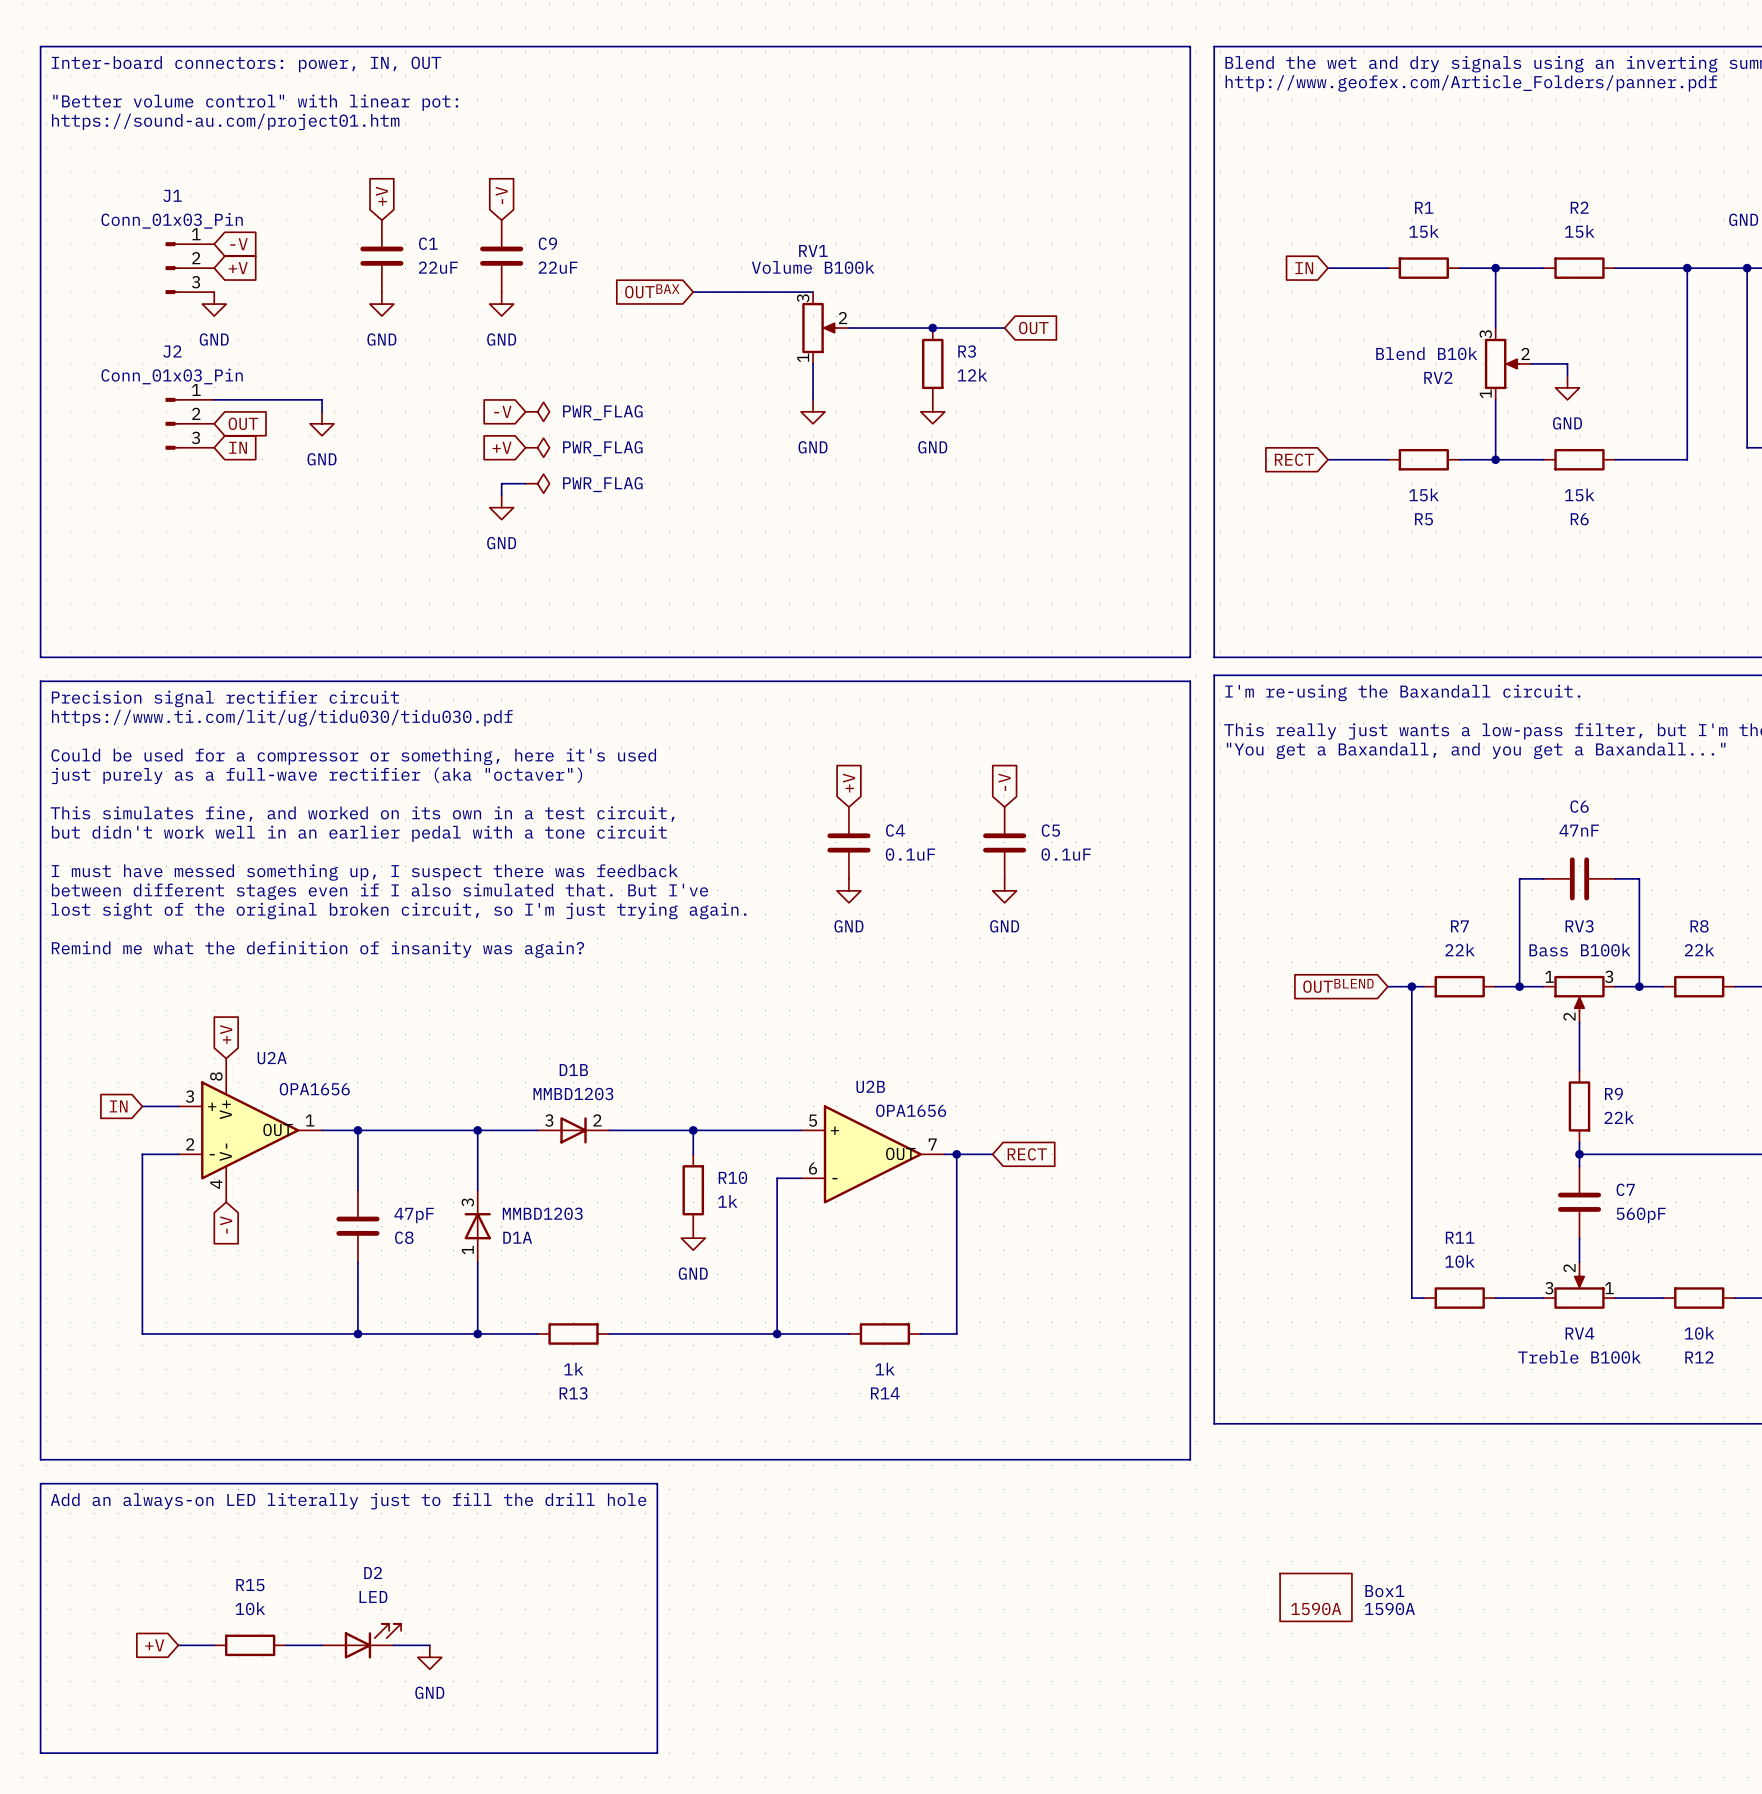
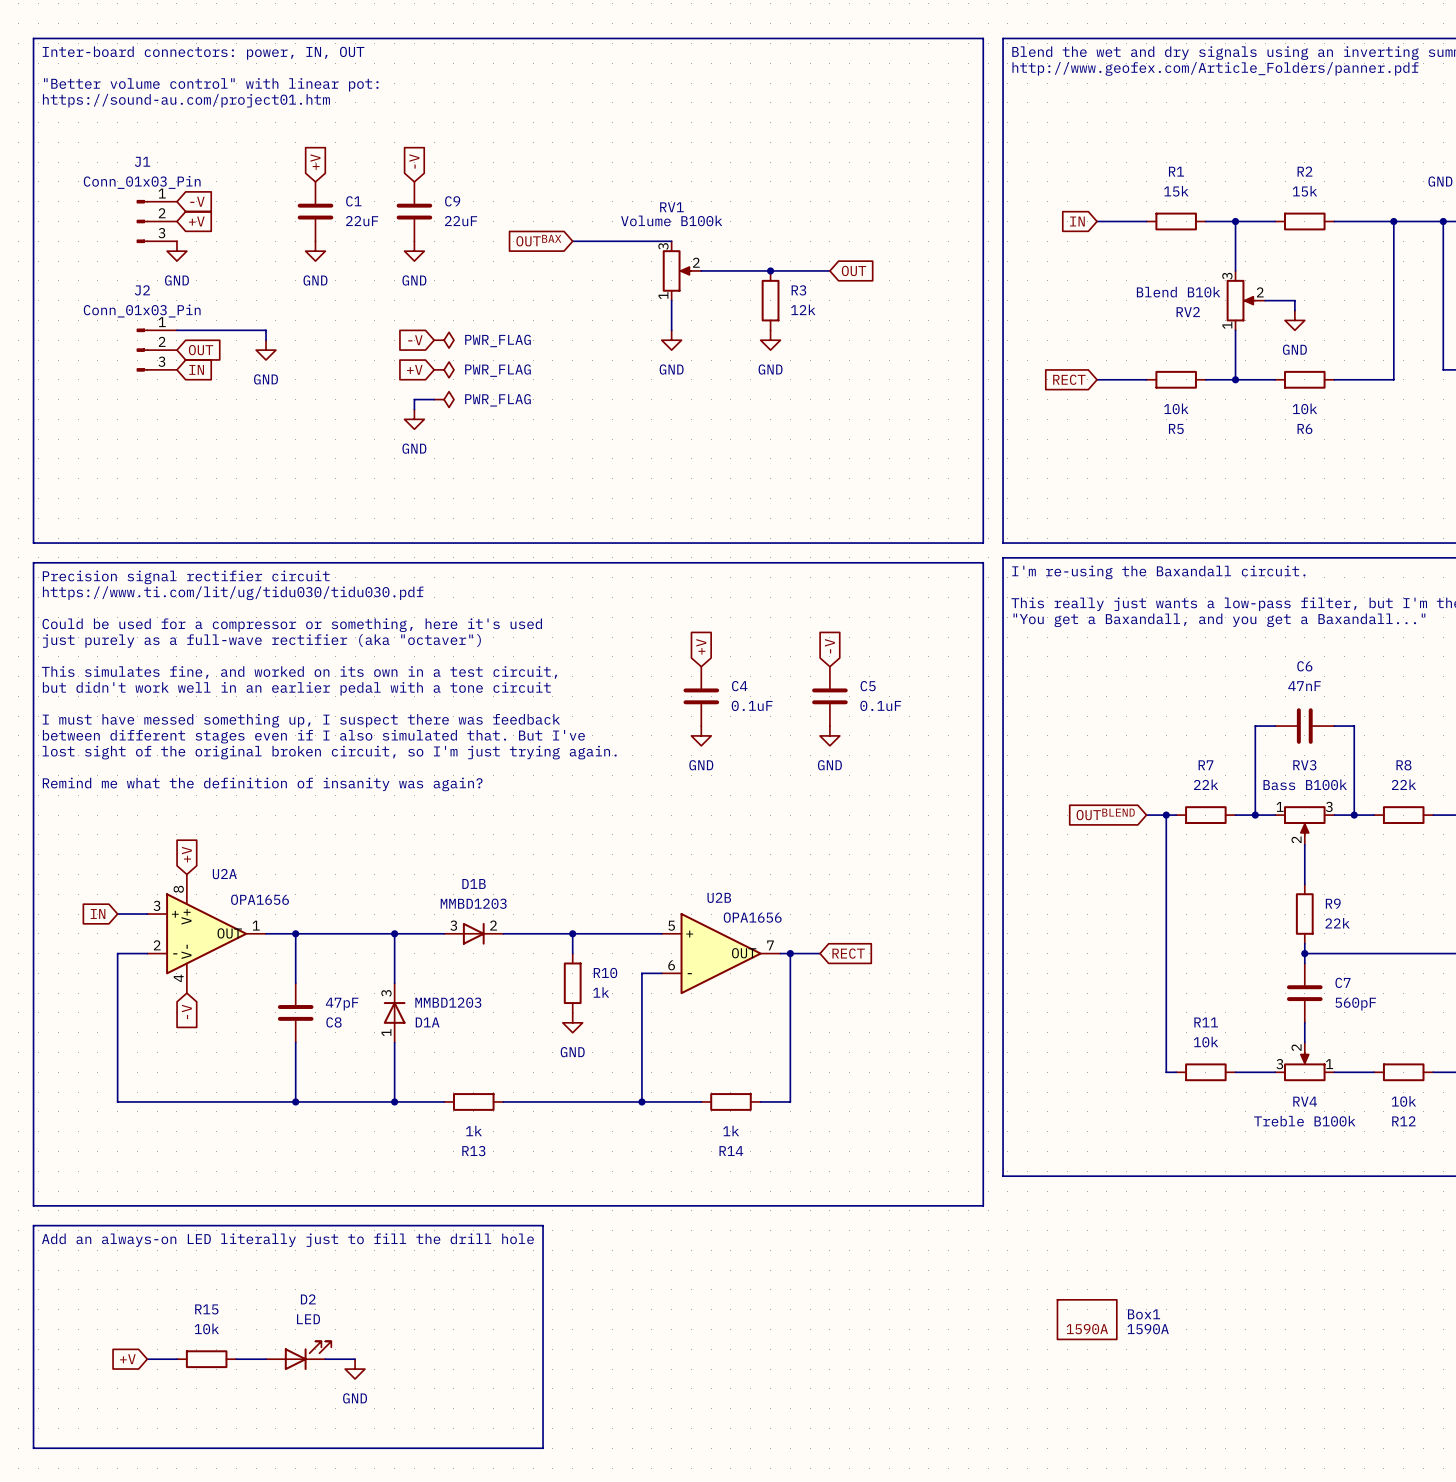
R5 value: 15k (1424, 494) -> 10k (1176, 408)
R6 value: 15k (1579, 494) -> 10k (1304, 408)

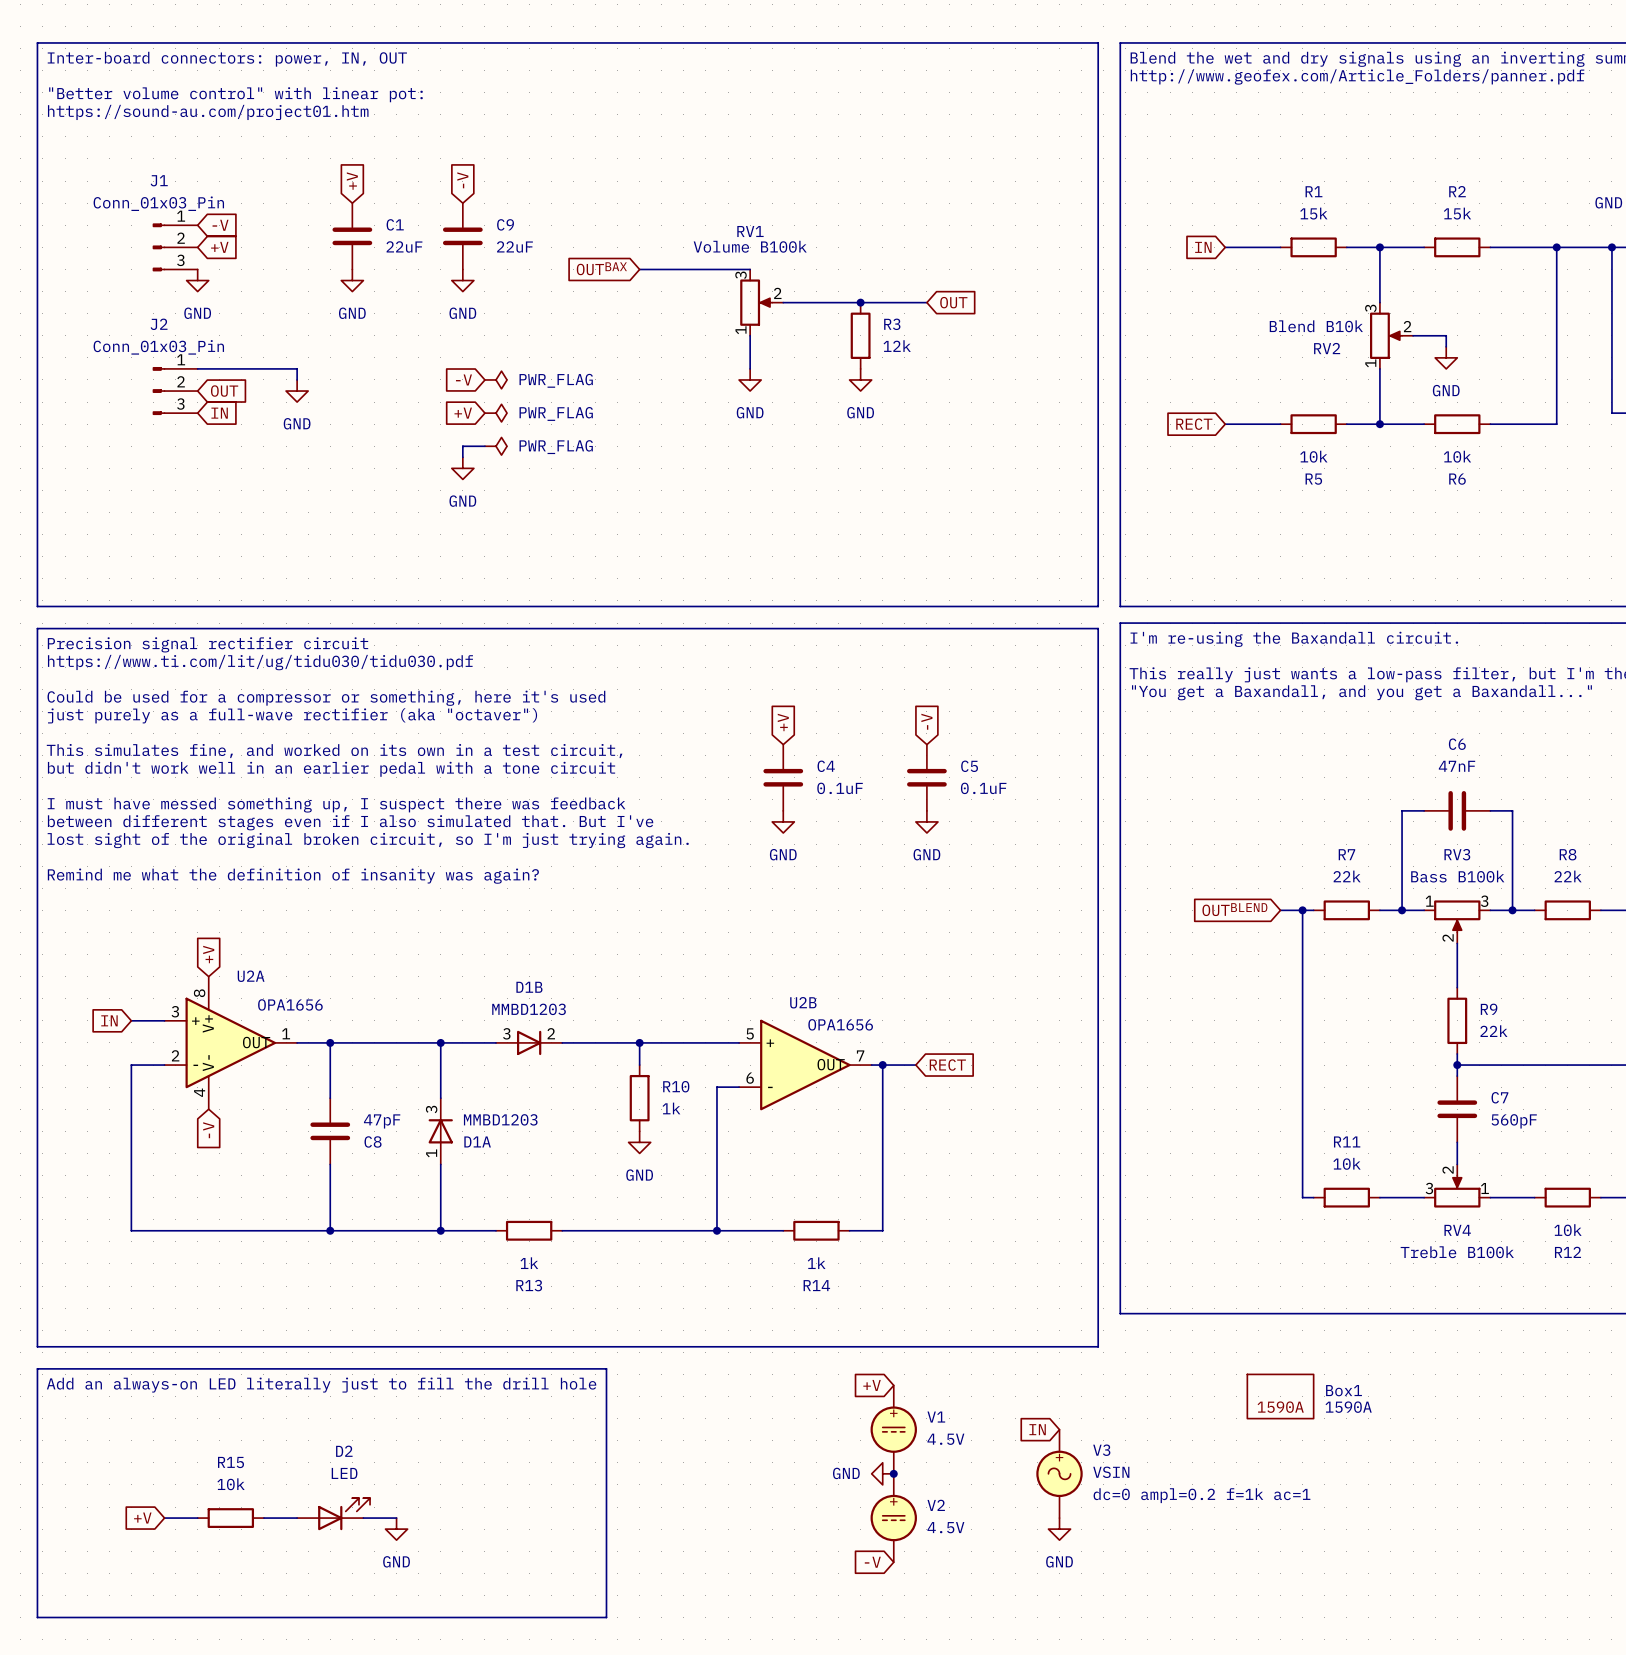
global label: none -> +V (872, 1385)
V1: none -> 4.5V (893, 1429)
global label: none -> IN (1037, 1429)
power symbol: none -> GND (882, 1473)
junction: none -> (893, 1473)
V3: none -> VSIN (1059, 1473)
Box1 position: (1087, 1319) -> (1280, 1396)
V2: none -> 4.5V (893, 1518)
power symbol: none -> GND (1059, 1529)
global label: none -> -V (872, 1562)

